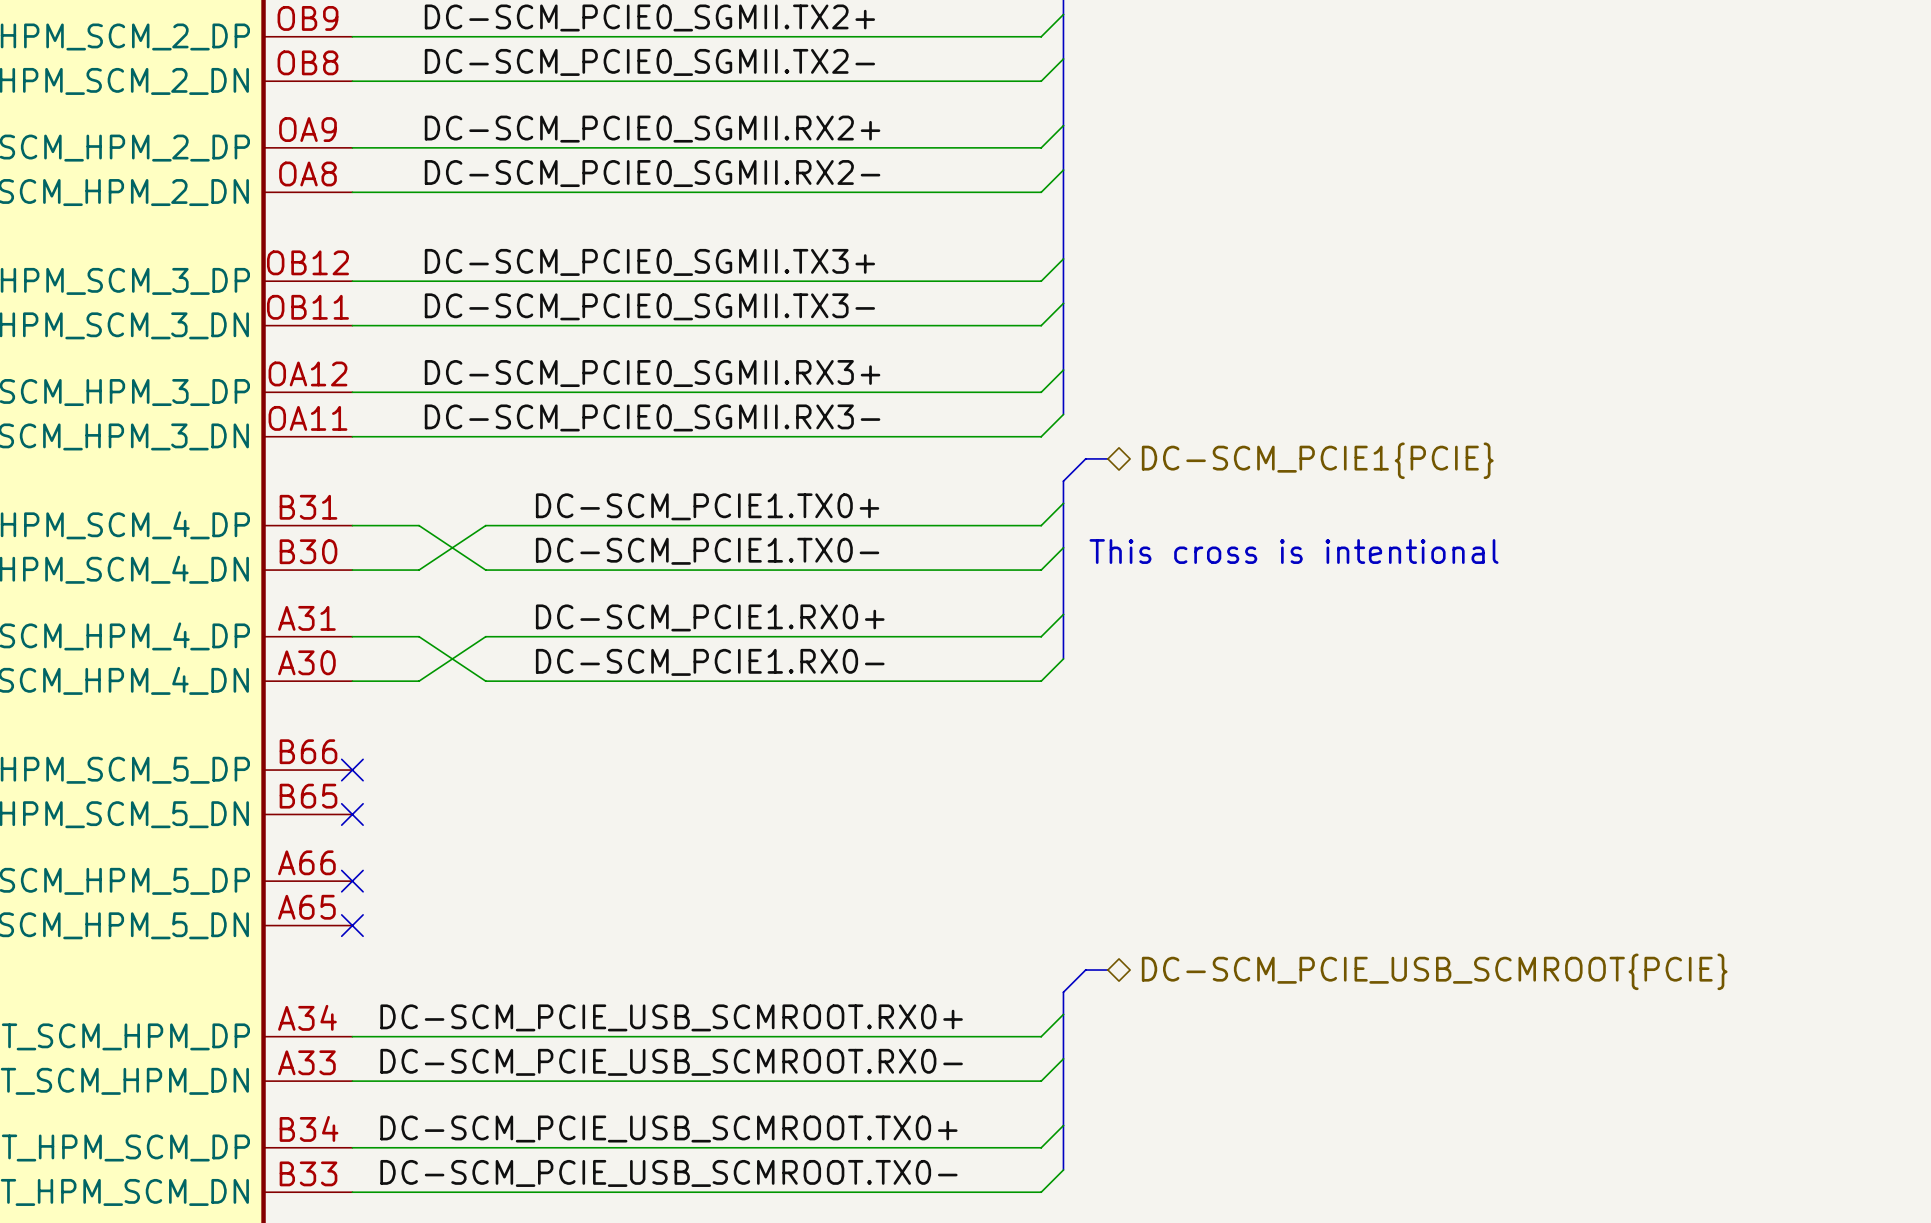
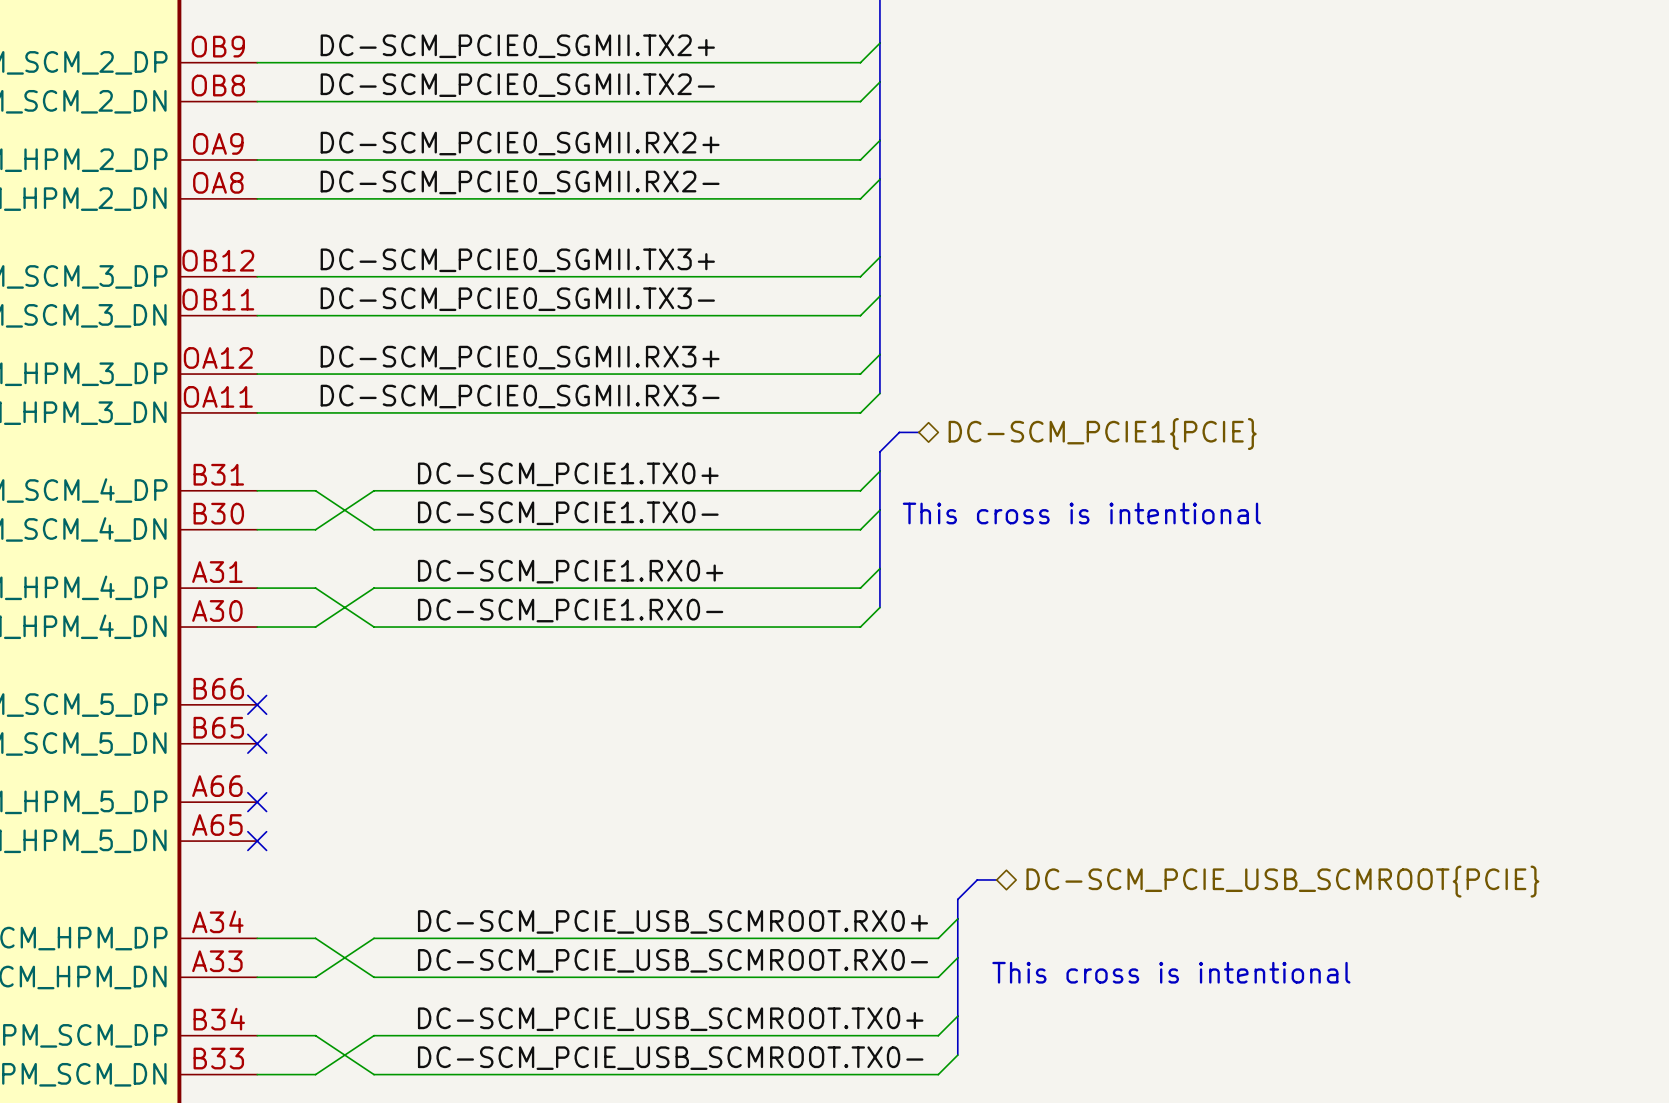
bus: (1107, 970) (1085, 970) (1063, 992) (1063, 1169) -> (996, 879) (977, 879) (957, 899) (957, 1055)
hierarchical label position: DC-SCM_PCIE_USB_SCMROOT{PCIE} (1434, 971) -> DC-SCM_PCIE_USB_SCMROOT{PCIE} (1282, 881)
wire: (1063, 1014) (1041, 1036) -> (957, 918) (938, 938) (860, 938)
label position: DC-SCM_PCIE_USB_SCMROOT.RX0+ (671, 1017) -> DC-SCM_PCIE_USB_SCMROOT.RX0+ (672, 921)
wire: (419, 1036) (485, 1036) -> (315, 938) (374, 977)
wire: (1063, 1058) (1041, 1081) -> (957, 957) (938, 977) (860, 977)
label position: DC-SCM_PCIE_USB_SCMROOT.RX0- (671, 1062) -> DC-SCM_PCIE_USB_SCMROOT.RX0- (672, 960)
text: none -> This cross is intentional (1171, 972)
wire: (419, 1081) (485, 1081) -> (315, 977) (374, 938)
wire: (1063, 1125) (1041, 1147) -> (957, 1016) (938, 1035) (860, 1035)
label position: DC-SCM_PCIE_USB_SCMROOT.TX0+ (668, 1129) -> DC-SCM_PCIE_USB_SCMROOT.TX0+ (670, 1019)
wire: (419, 1147) (485, 1147) -> (315, 1035) (374, 1074)
wire: (1063, 1169) (1041, 1192) -> (957, 1055) (938, 1074) (860, 1074)
label position: DC-SCM_PCIE_USB_SCMROOT.TX0- (668, 1173) -> DC-SCM_PCIE_USB_SCMROOT.TX0- (670, 1058)
wire: (419, 1192) (485, 1192) -> (315, 1074) (374, 1035)

